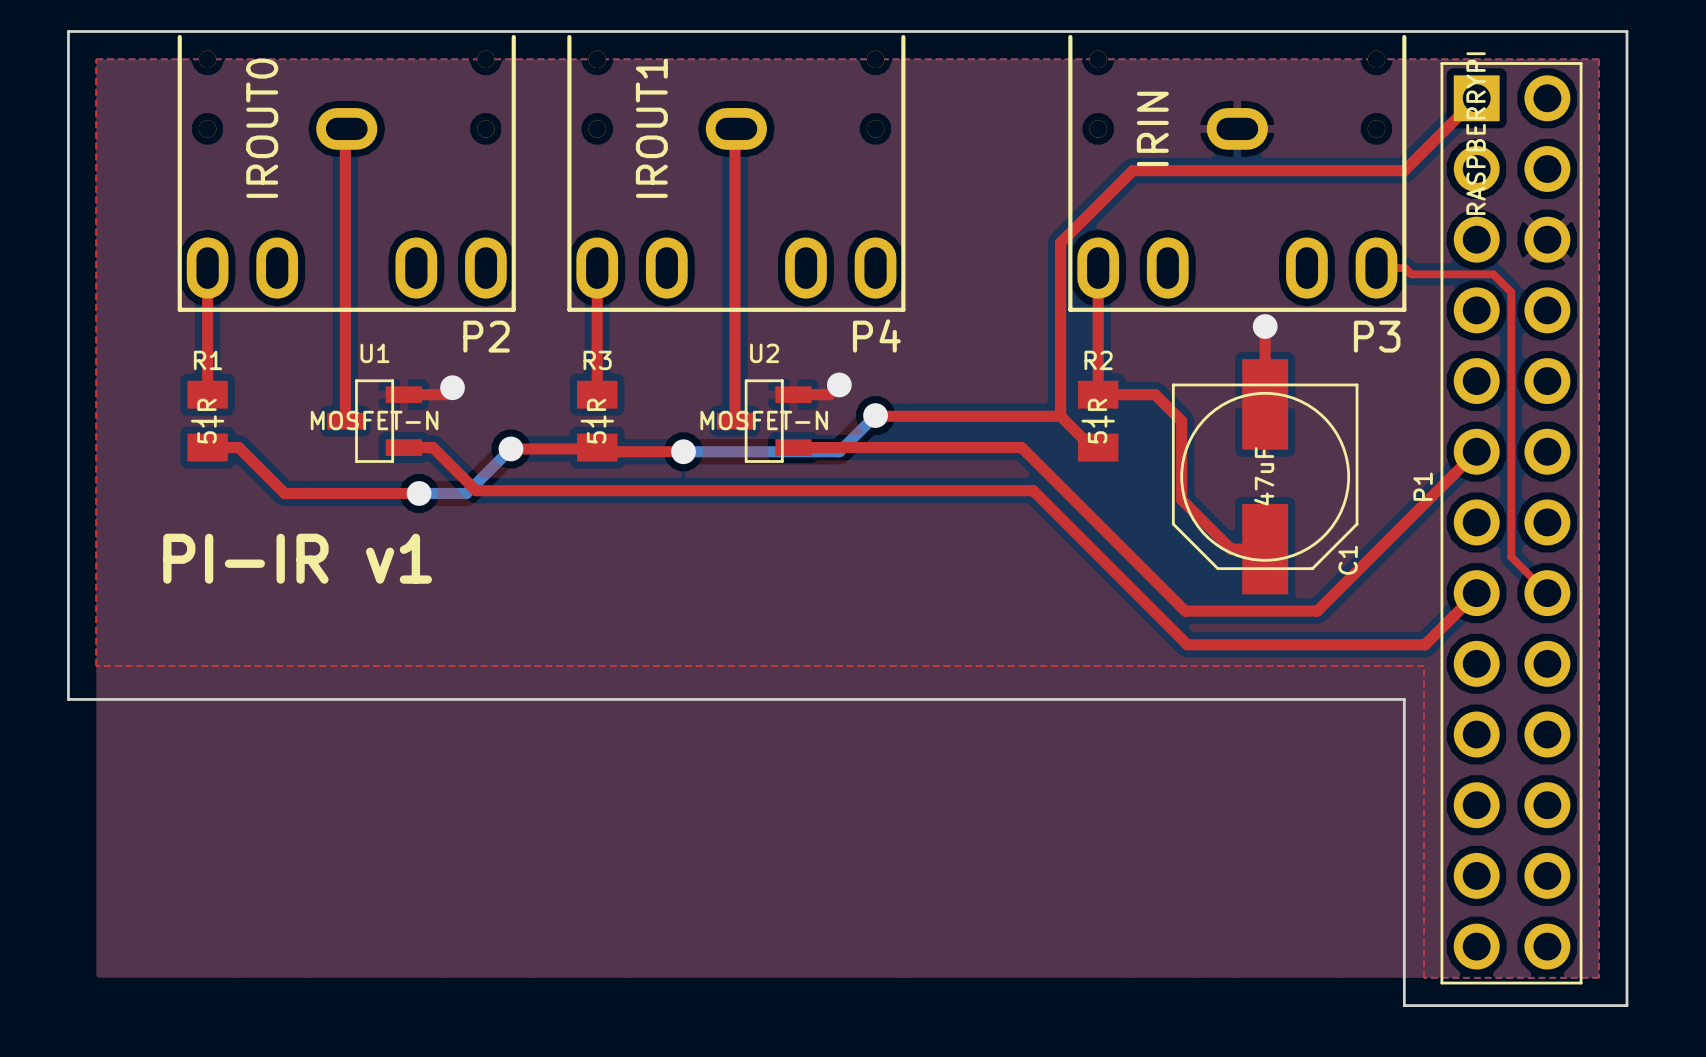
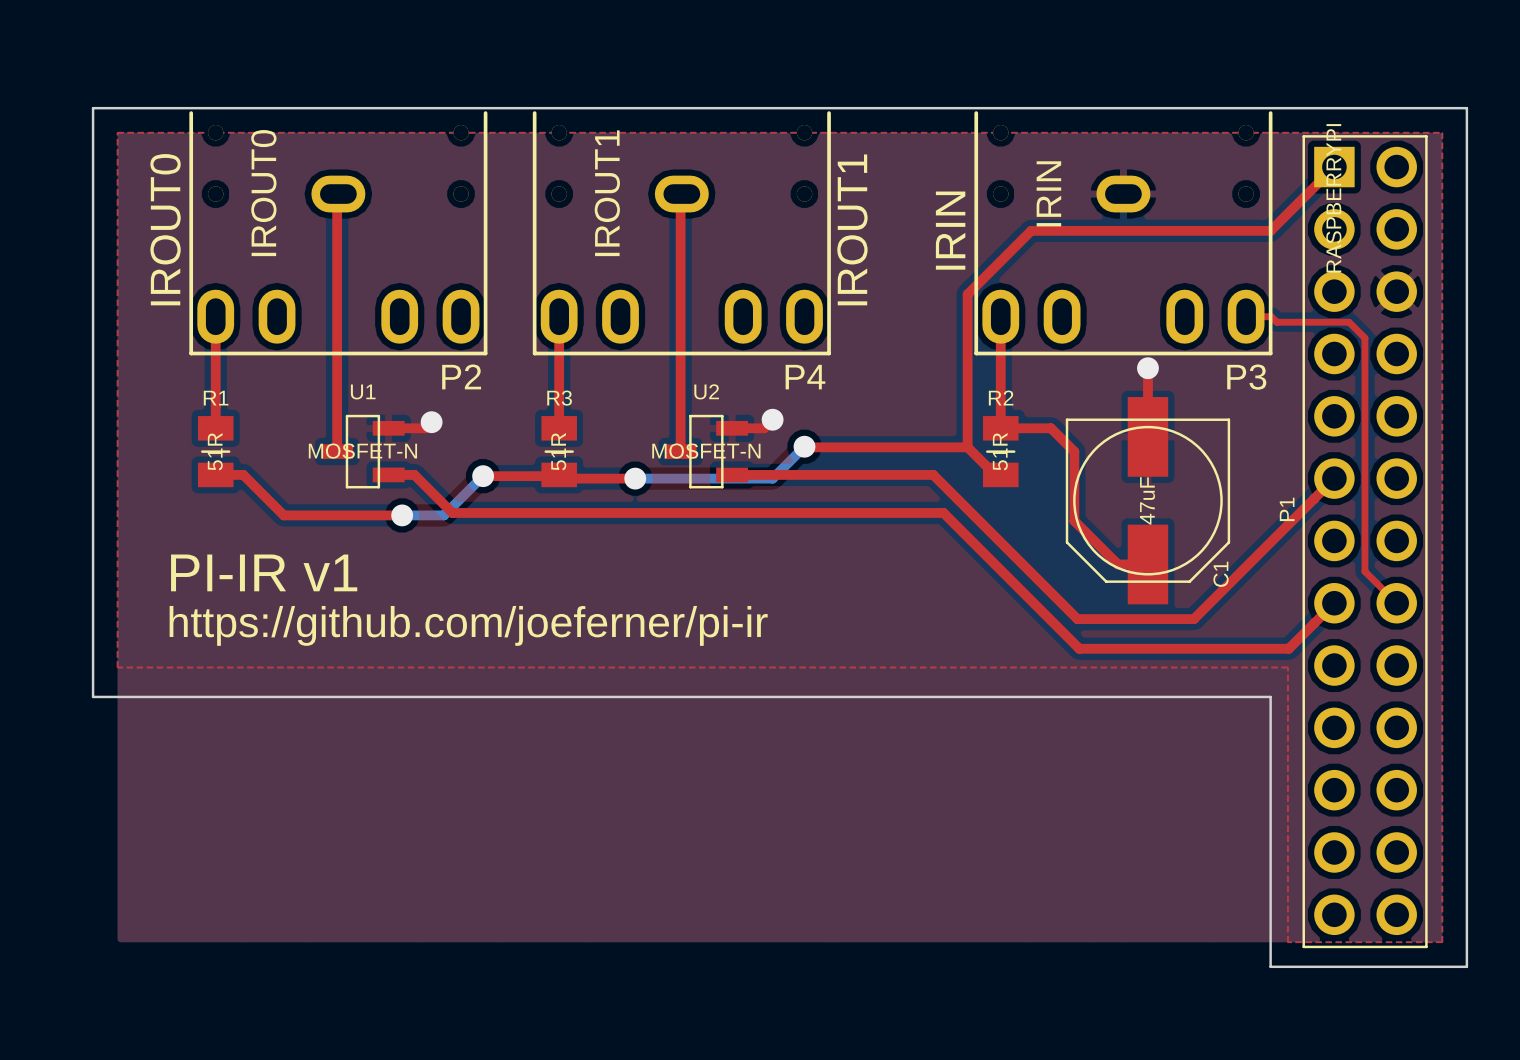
text: none -> IROUT0 (165, 229)
text: none -> IROUT1 (852, 229)
text: none -> IRIN (950, 230)
text: none -> https://github.com/joeferner/pi-ir (468, 625)

